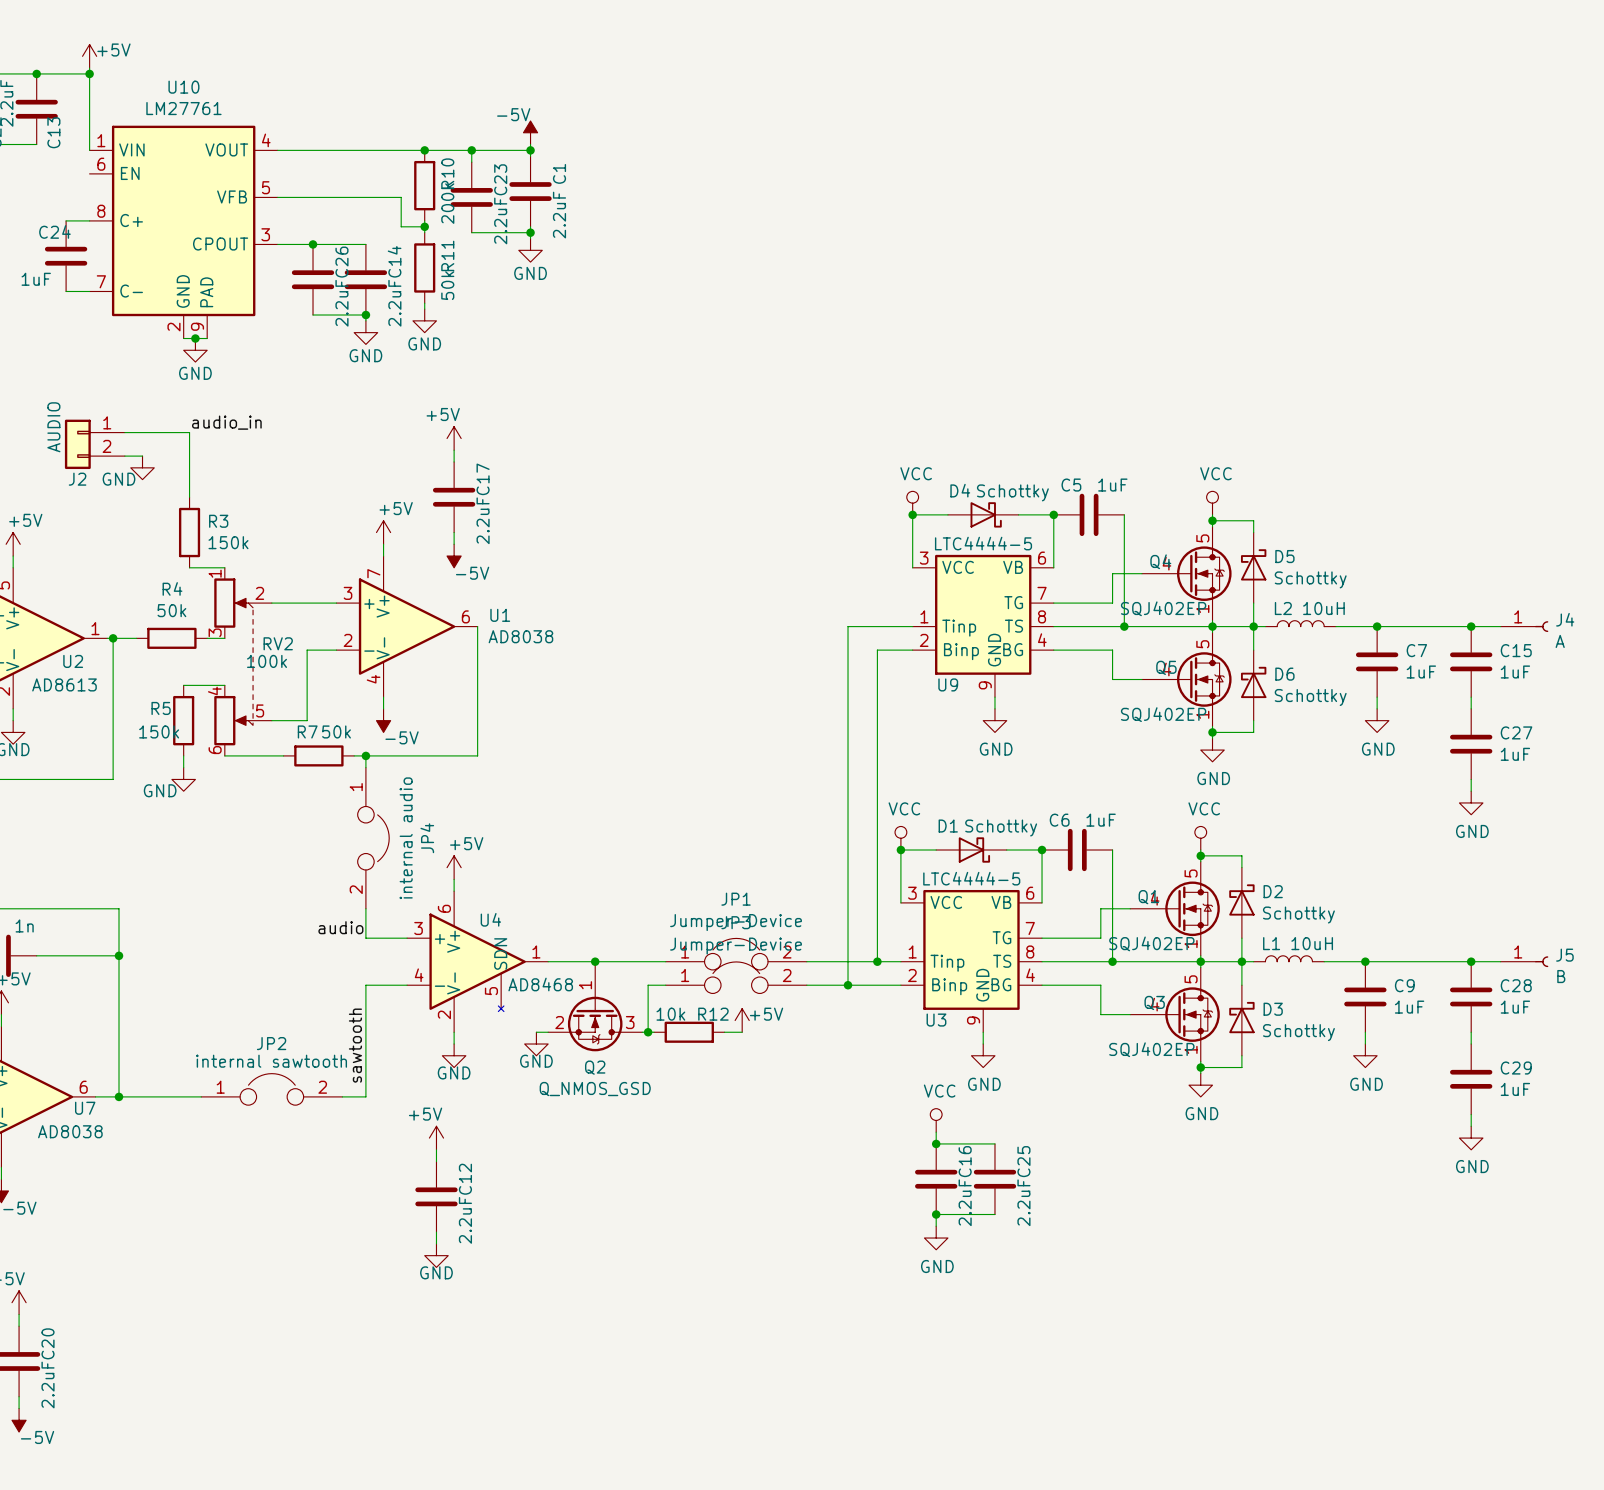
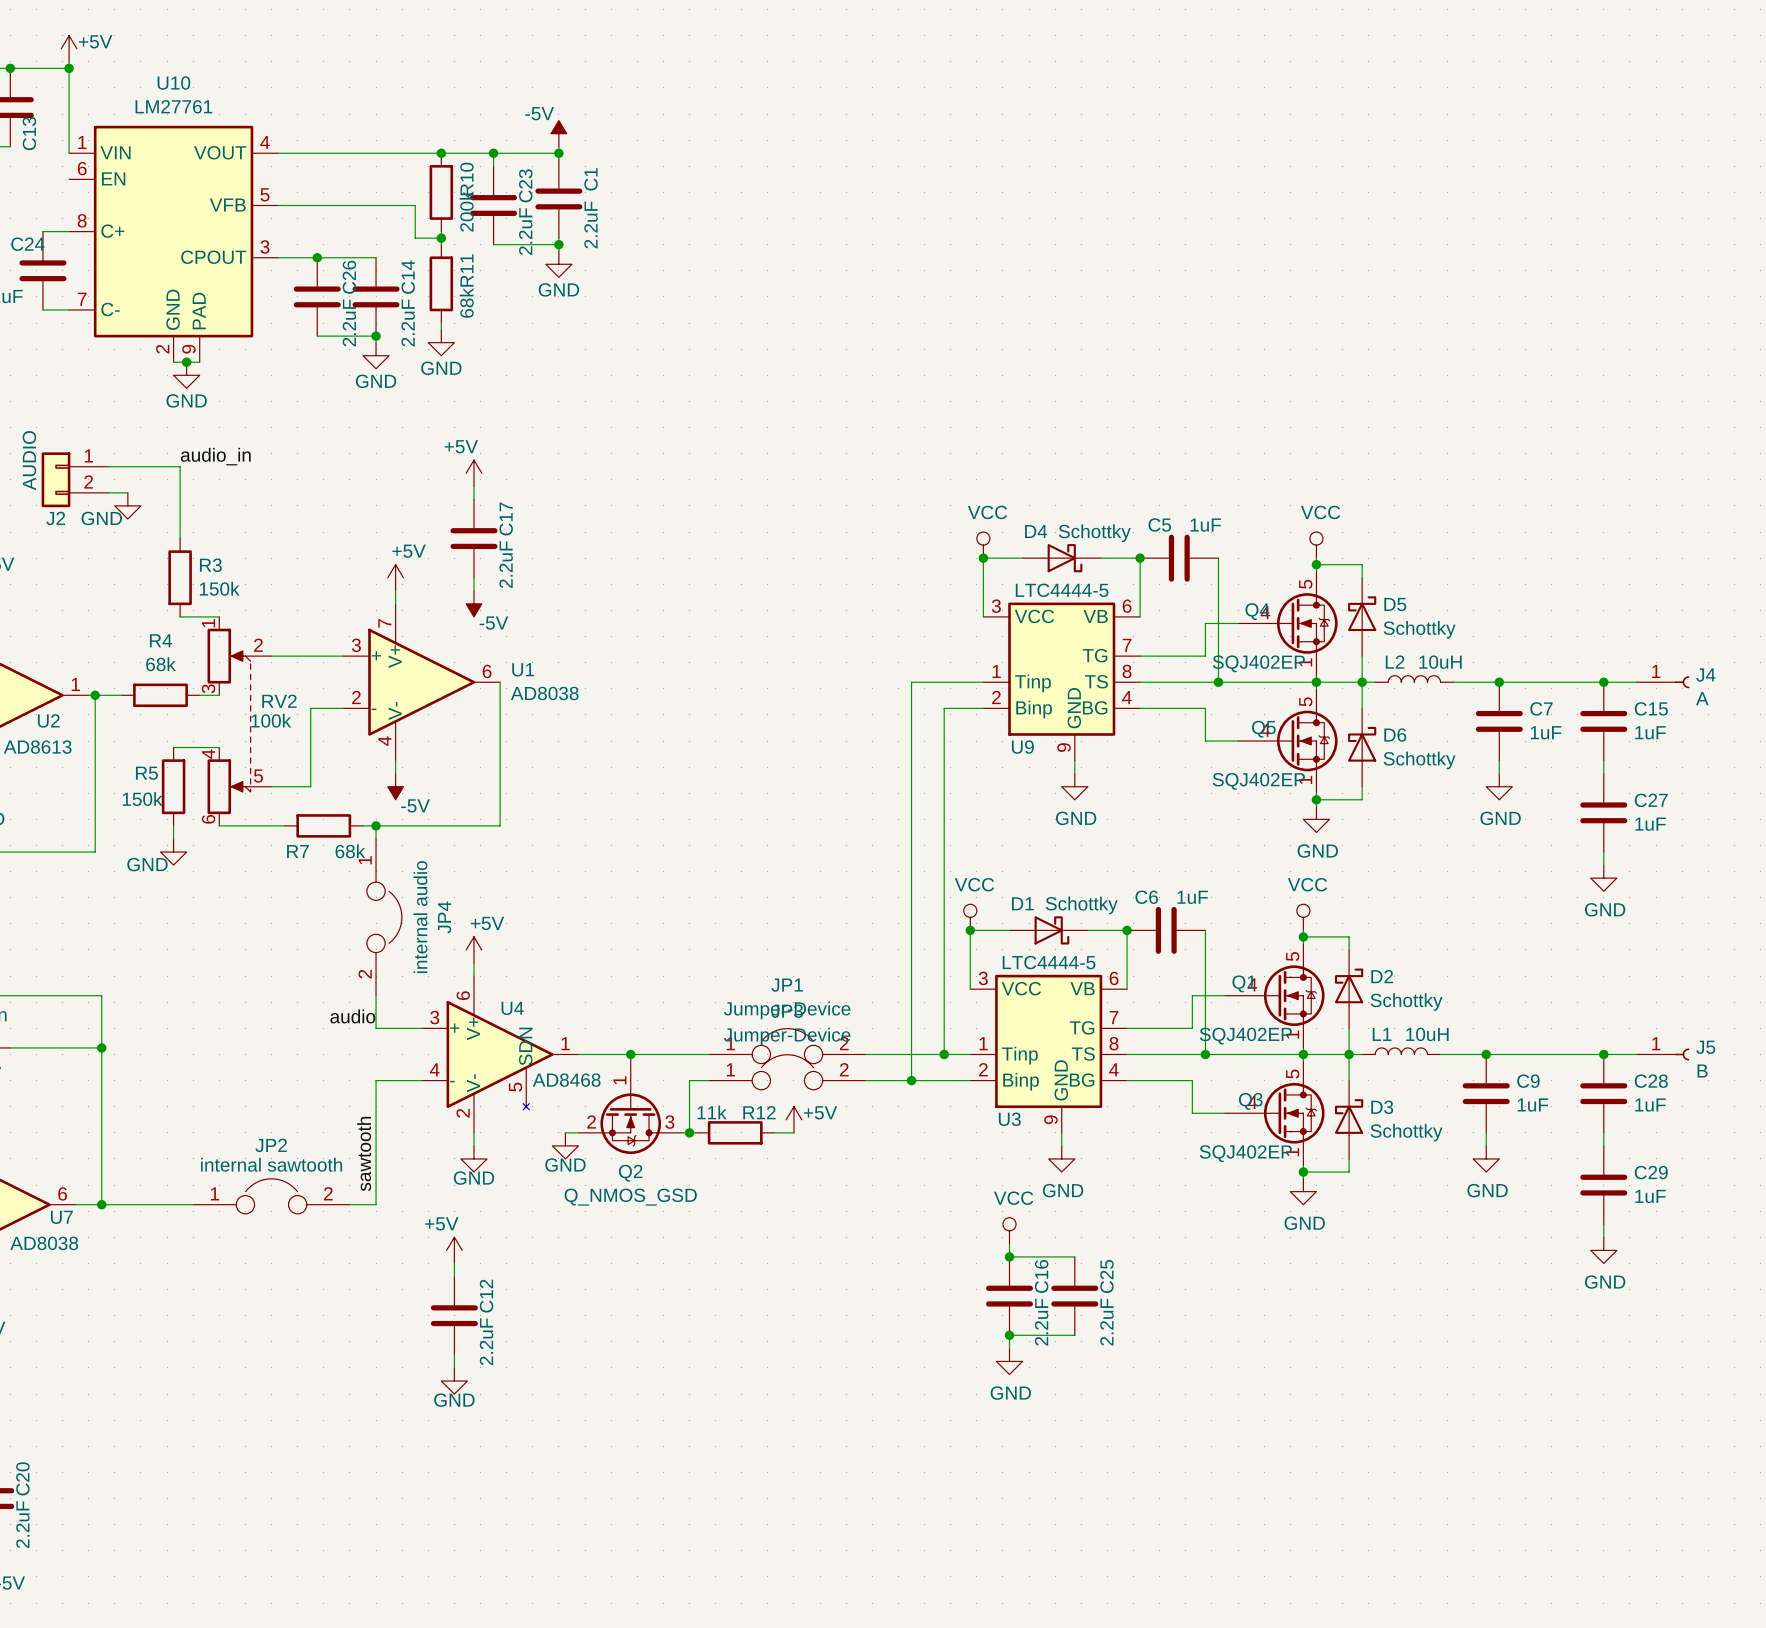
R11 value: 50k (447, 285) -> 68k (466, 302)
R4 value: 50k (171, 610) -> 68k (161, 664)
R7 name position: R7 (307, 731) -> R7 (297, 851)
R7 value: 50k (336, 731) -> 68k (350, 851)
R12 value: 10k (670, 1014) -> 11k (712, 1112)

